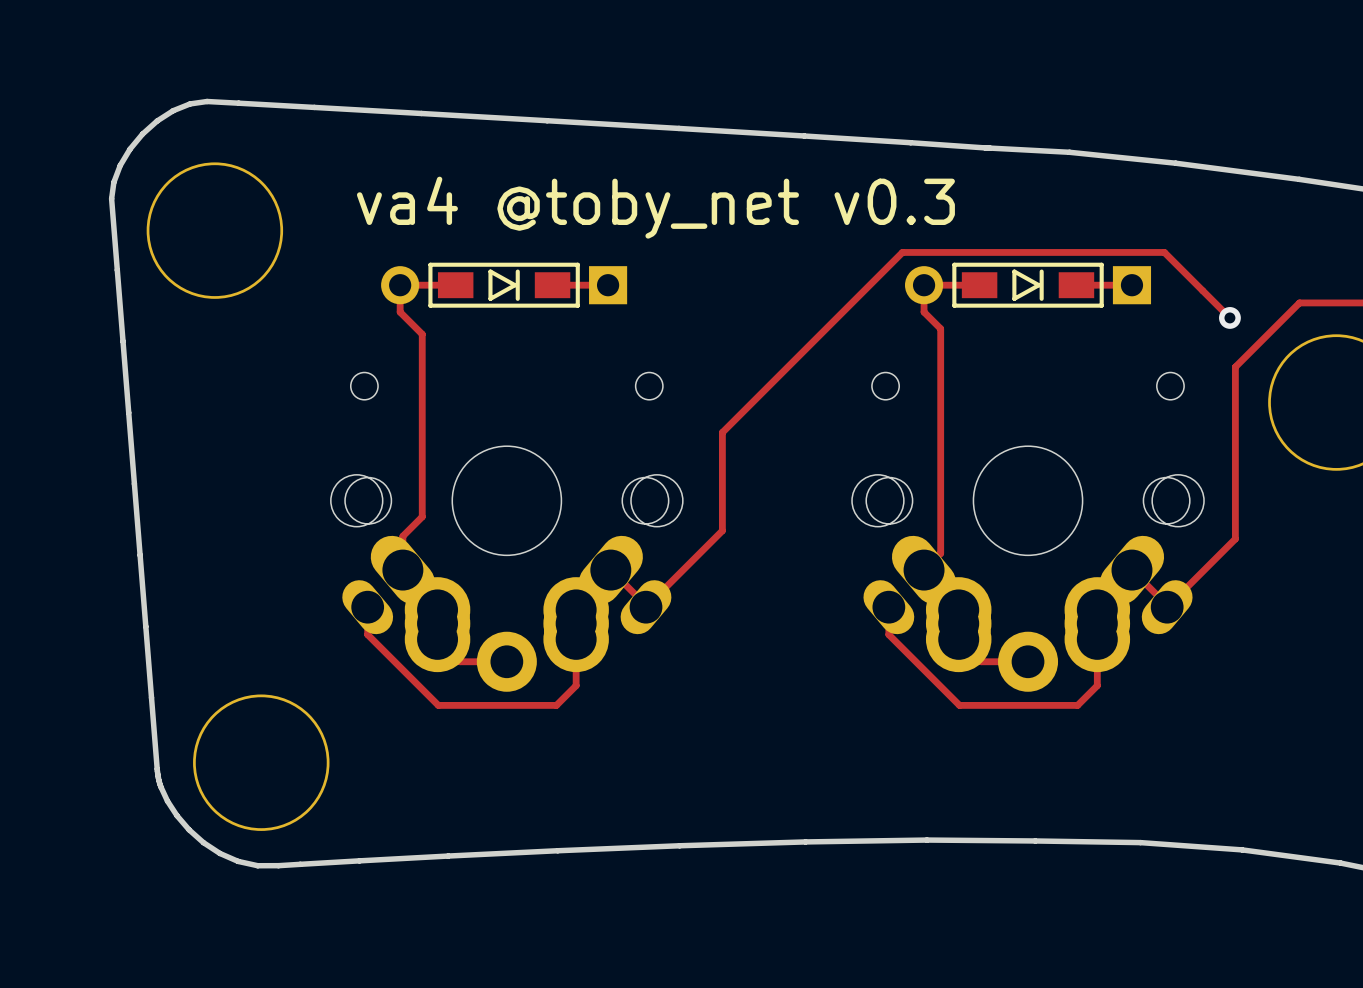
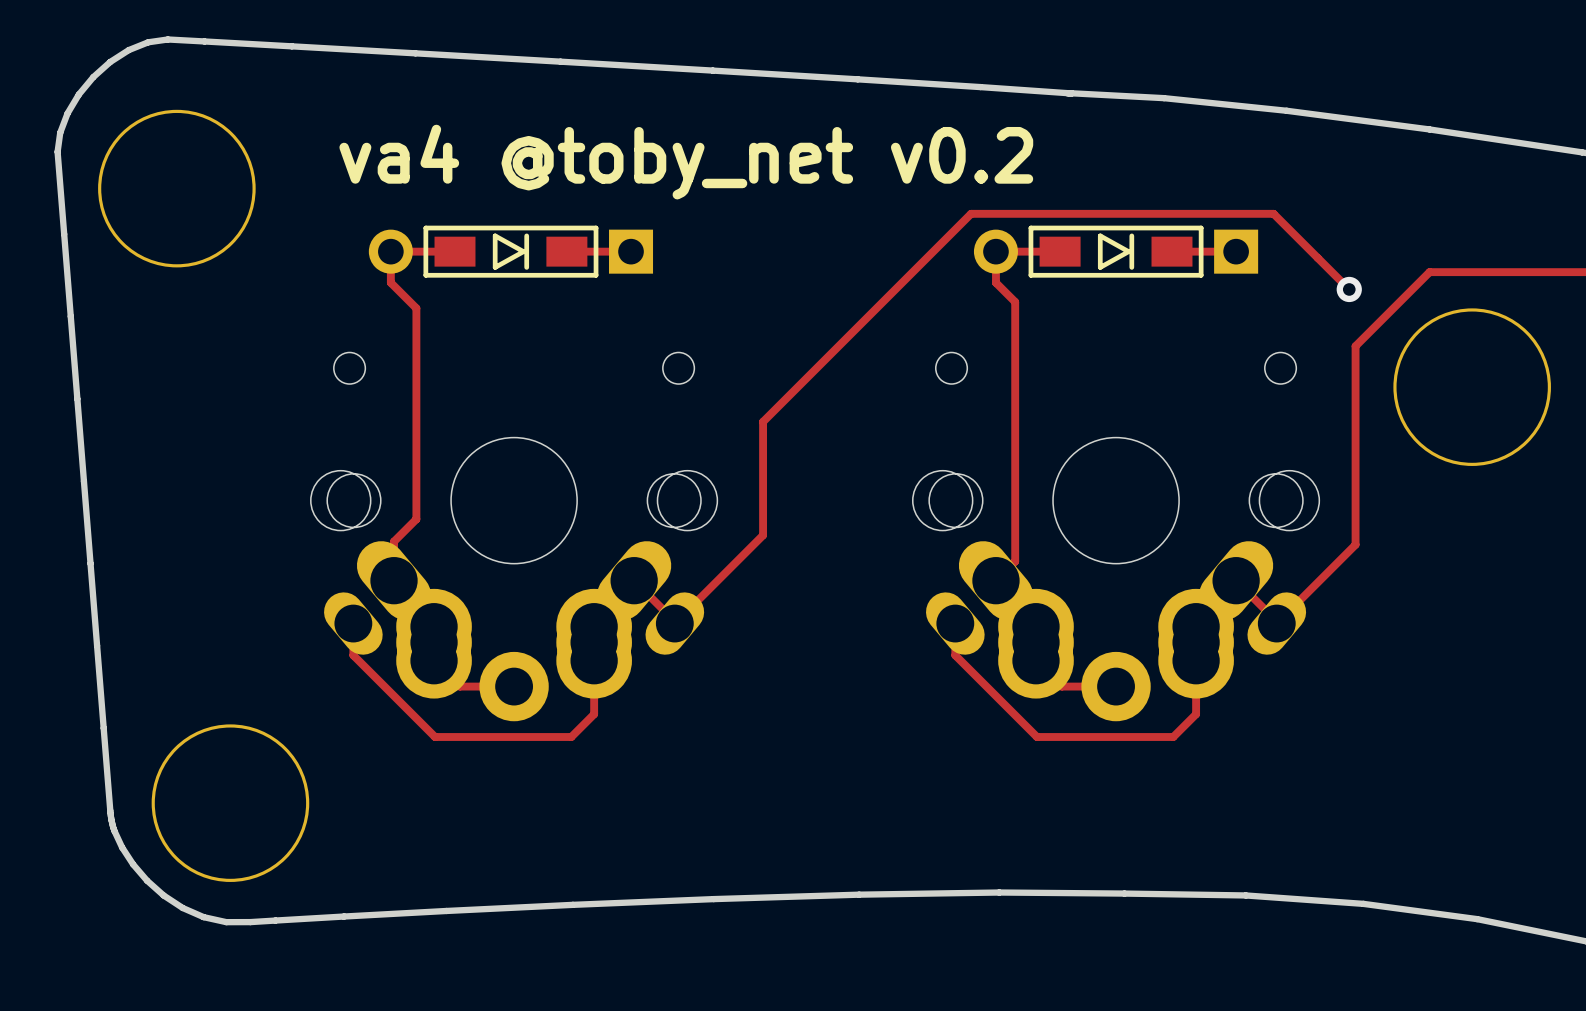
text: va4 @toby_net v0.3 (655, 207) -> va4 @toby_net v0.2 (686, 162)

